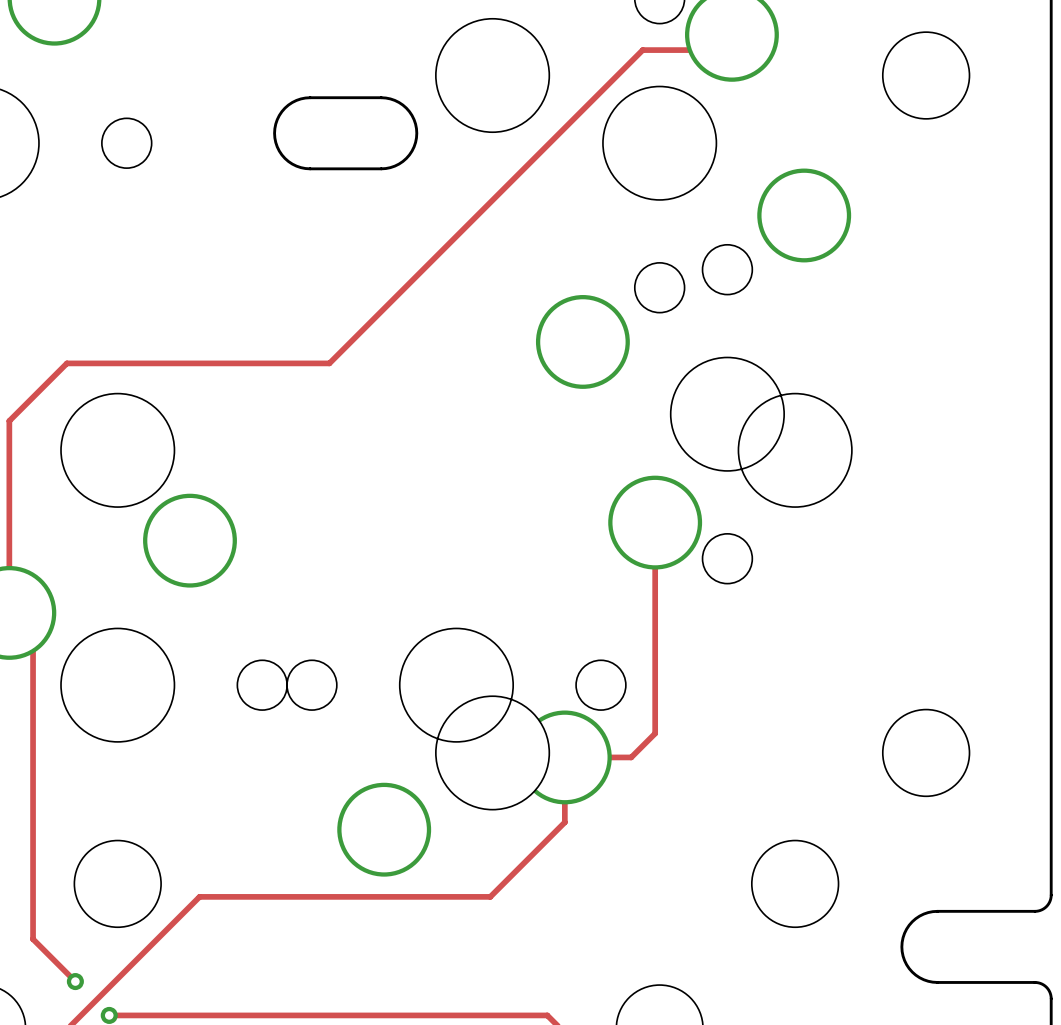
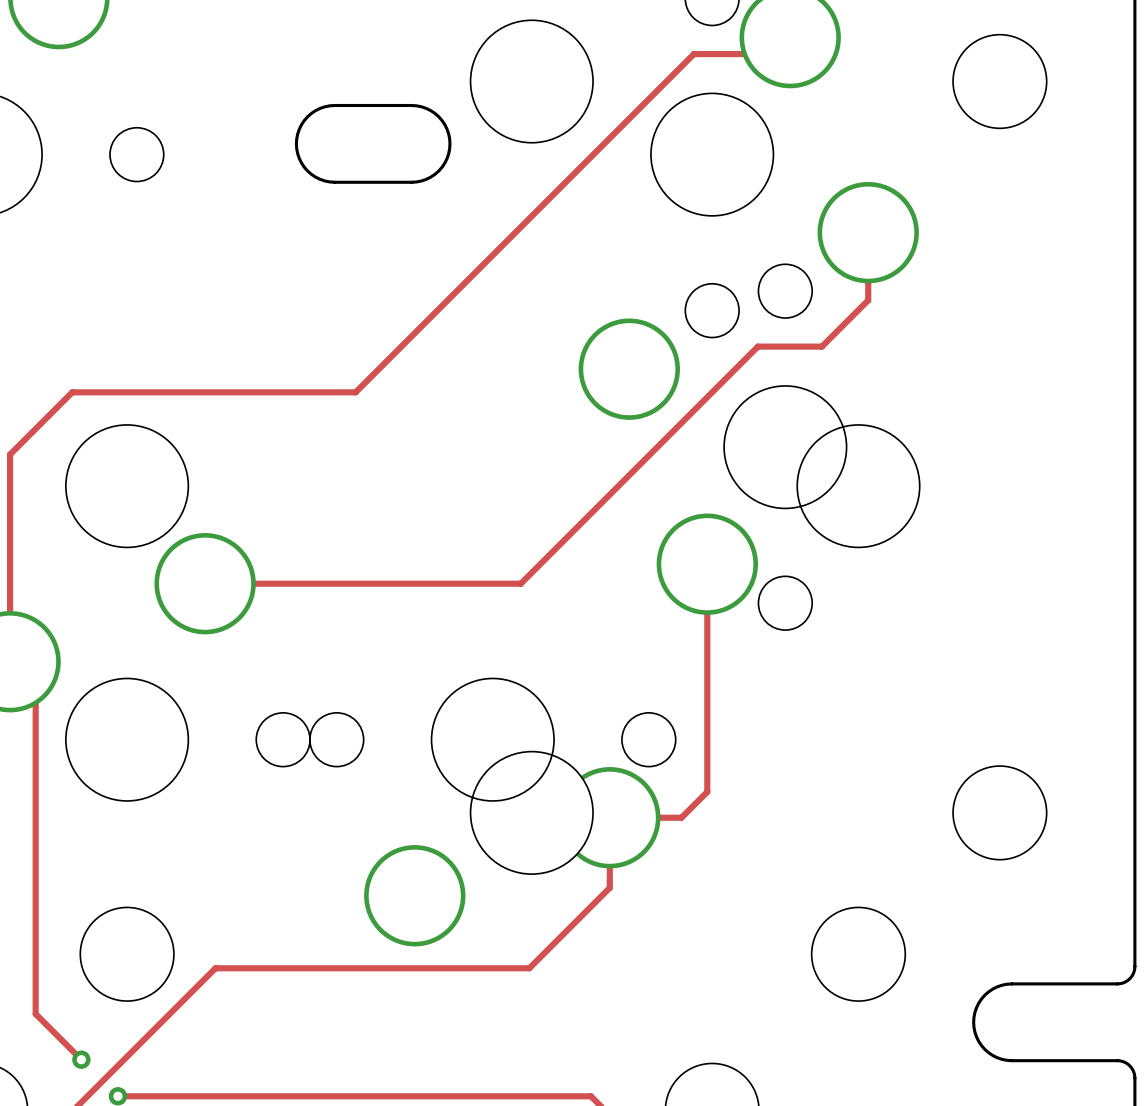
track: none -> (868, 232) (868, 300) (821, 346) (757, 346) (520, 583) (205, 583)

